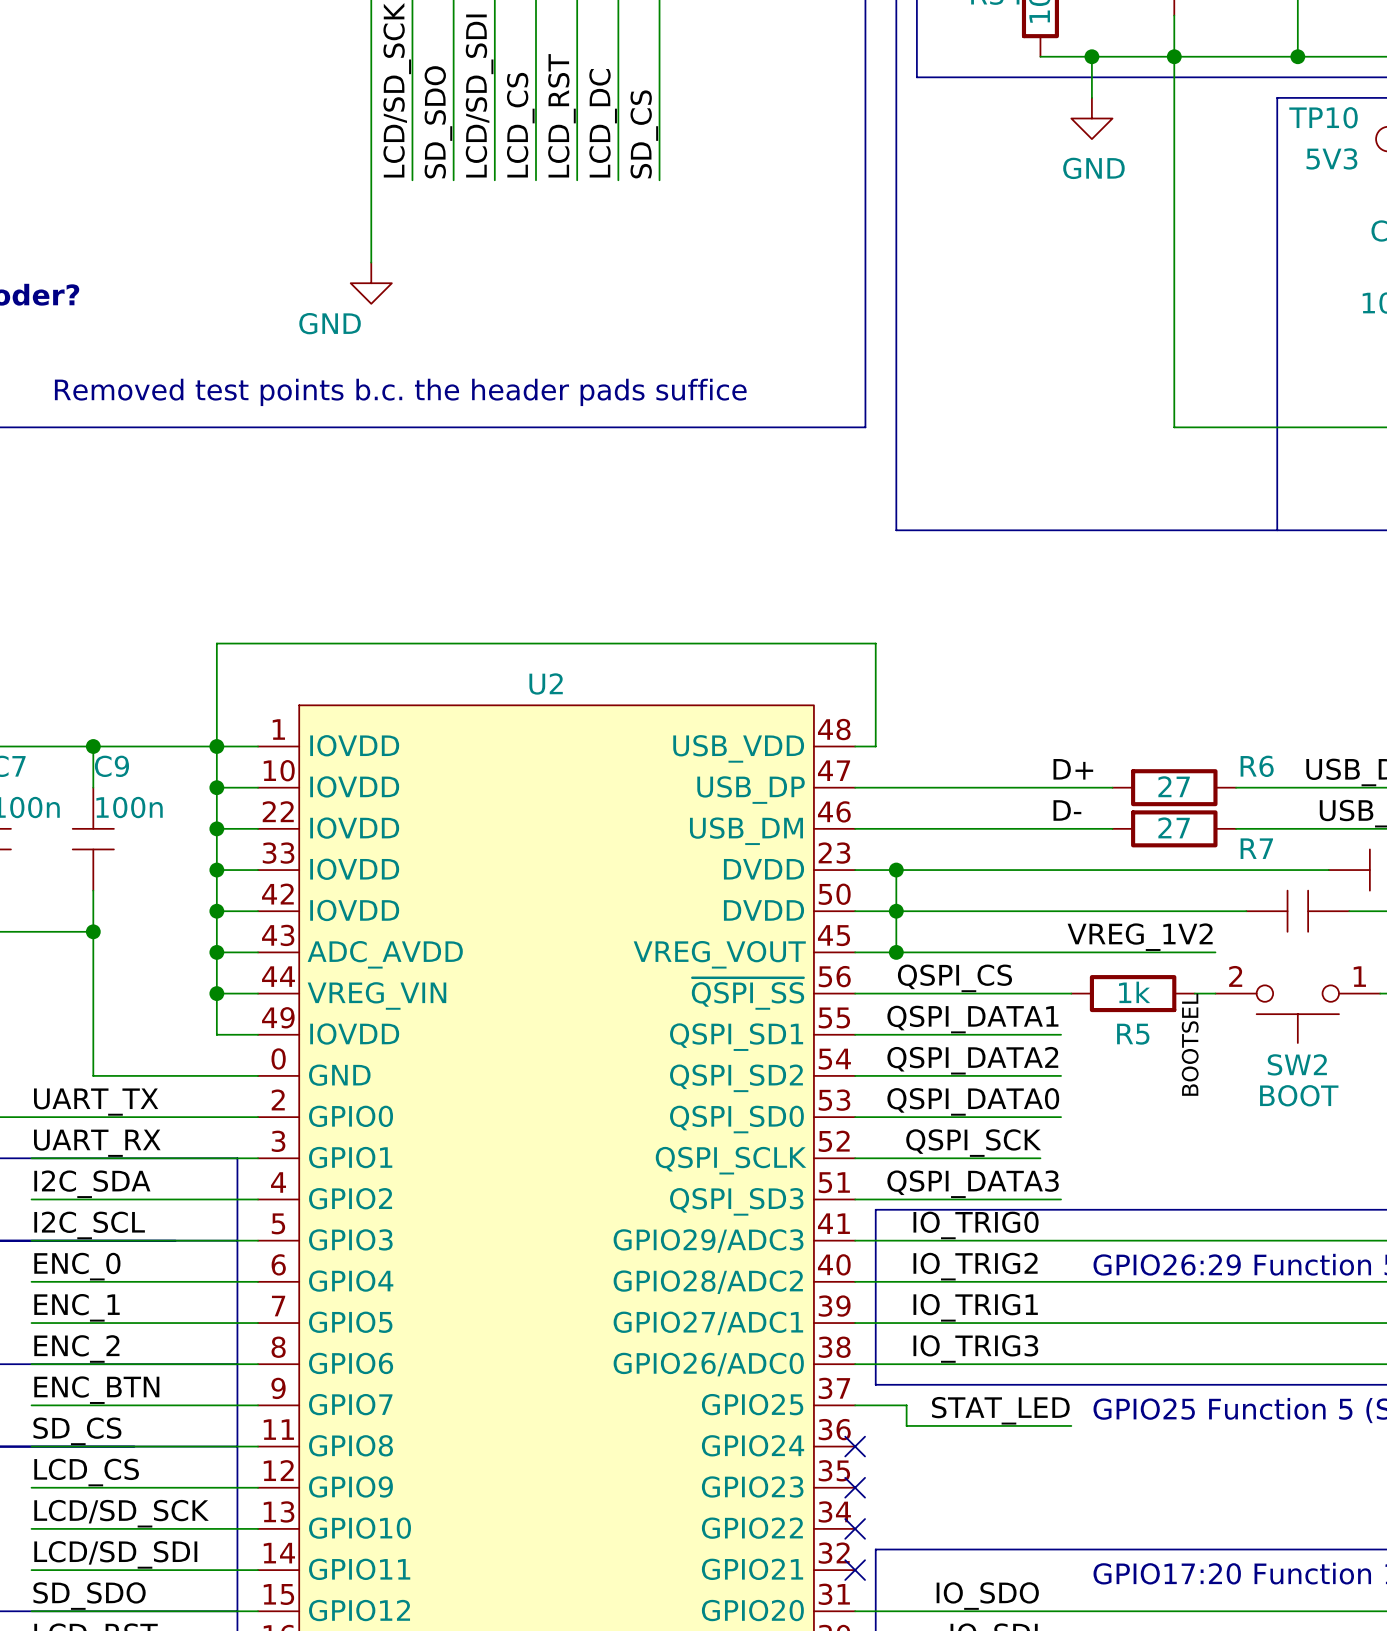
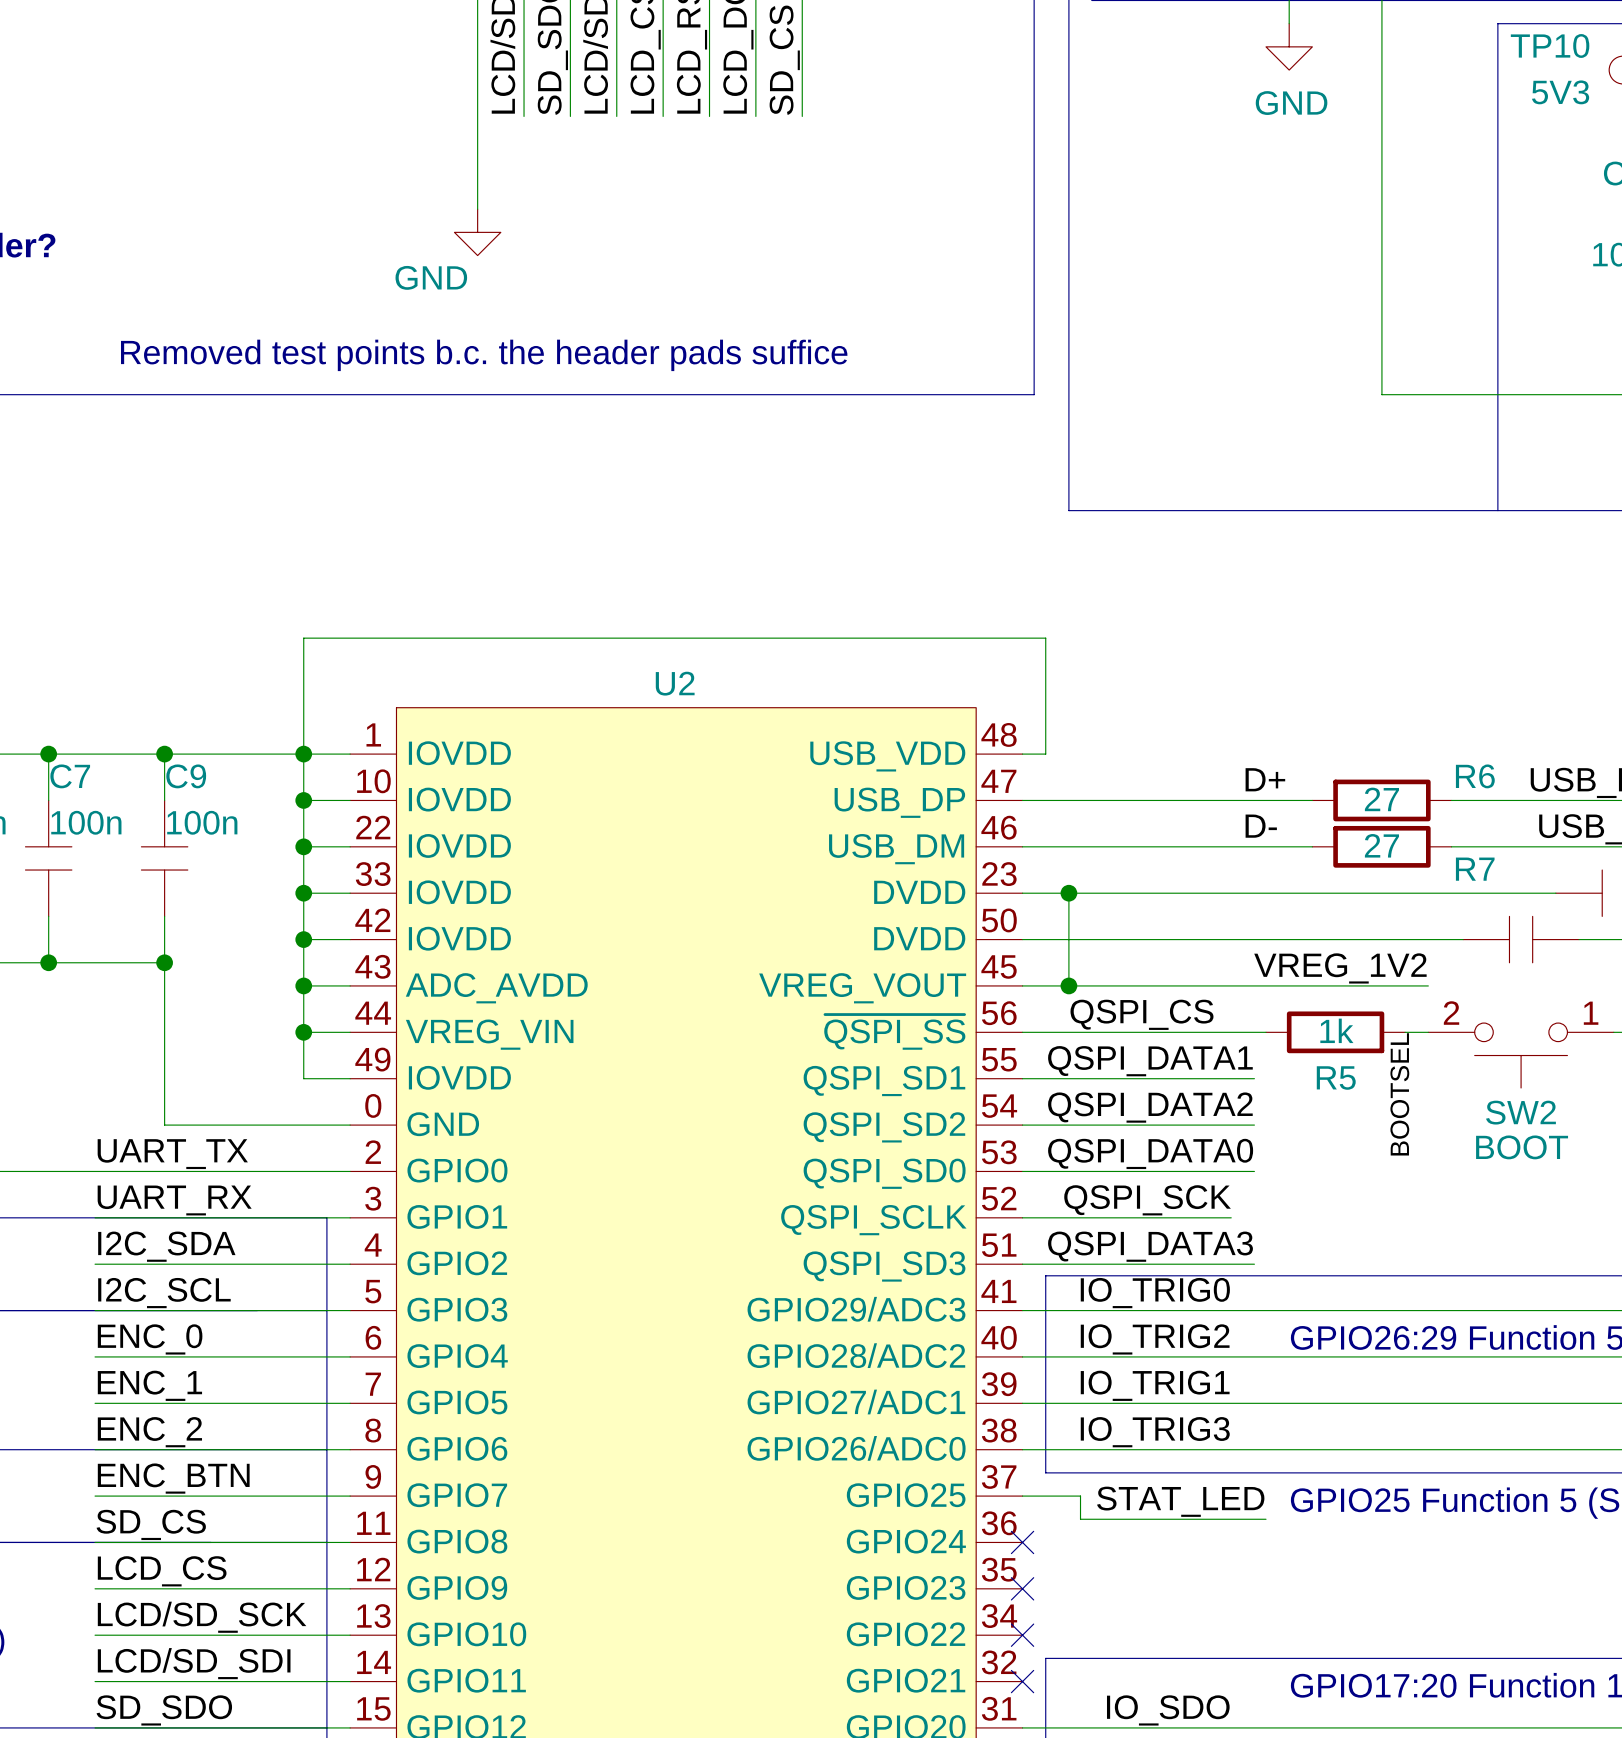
junction: (896, 911) -> none

